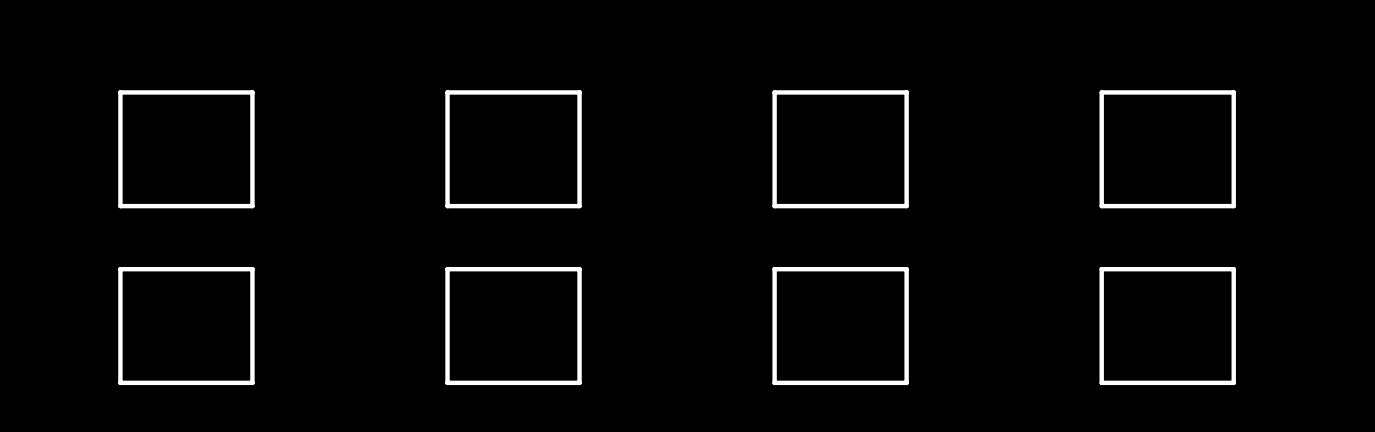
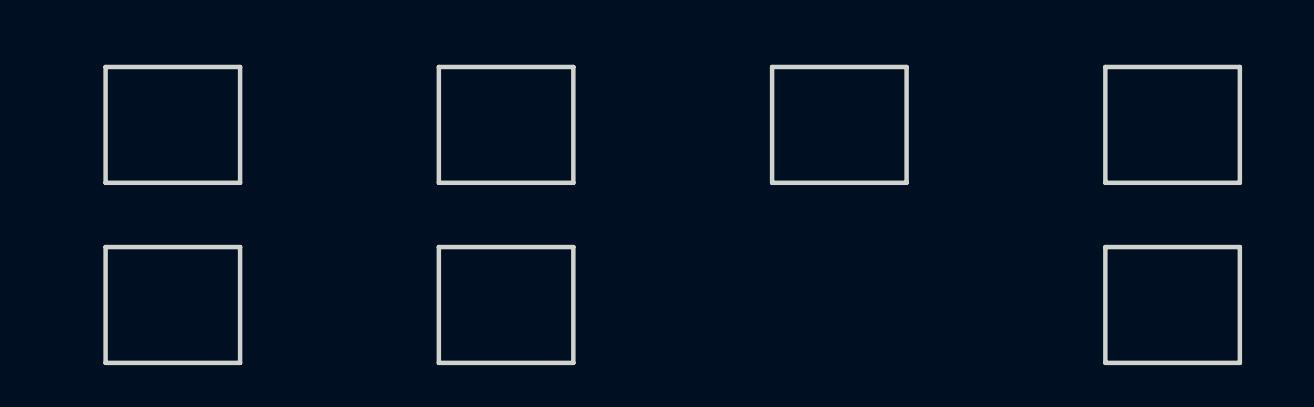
part: (840, 326) -> none

